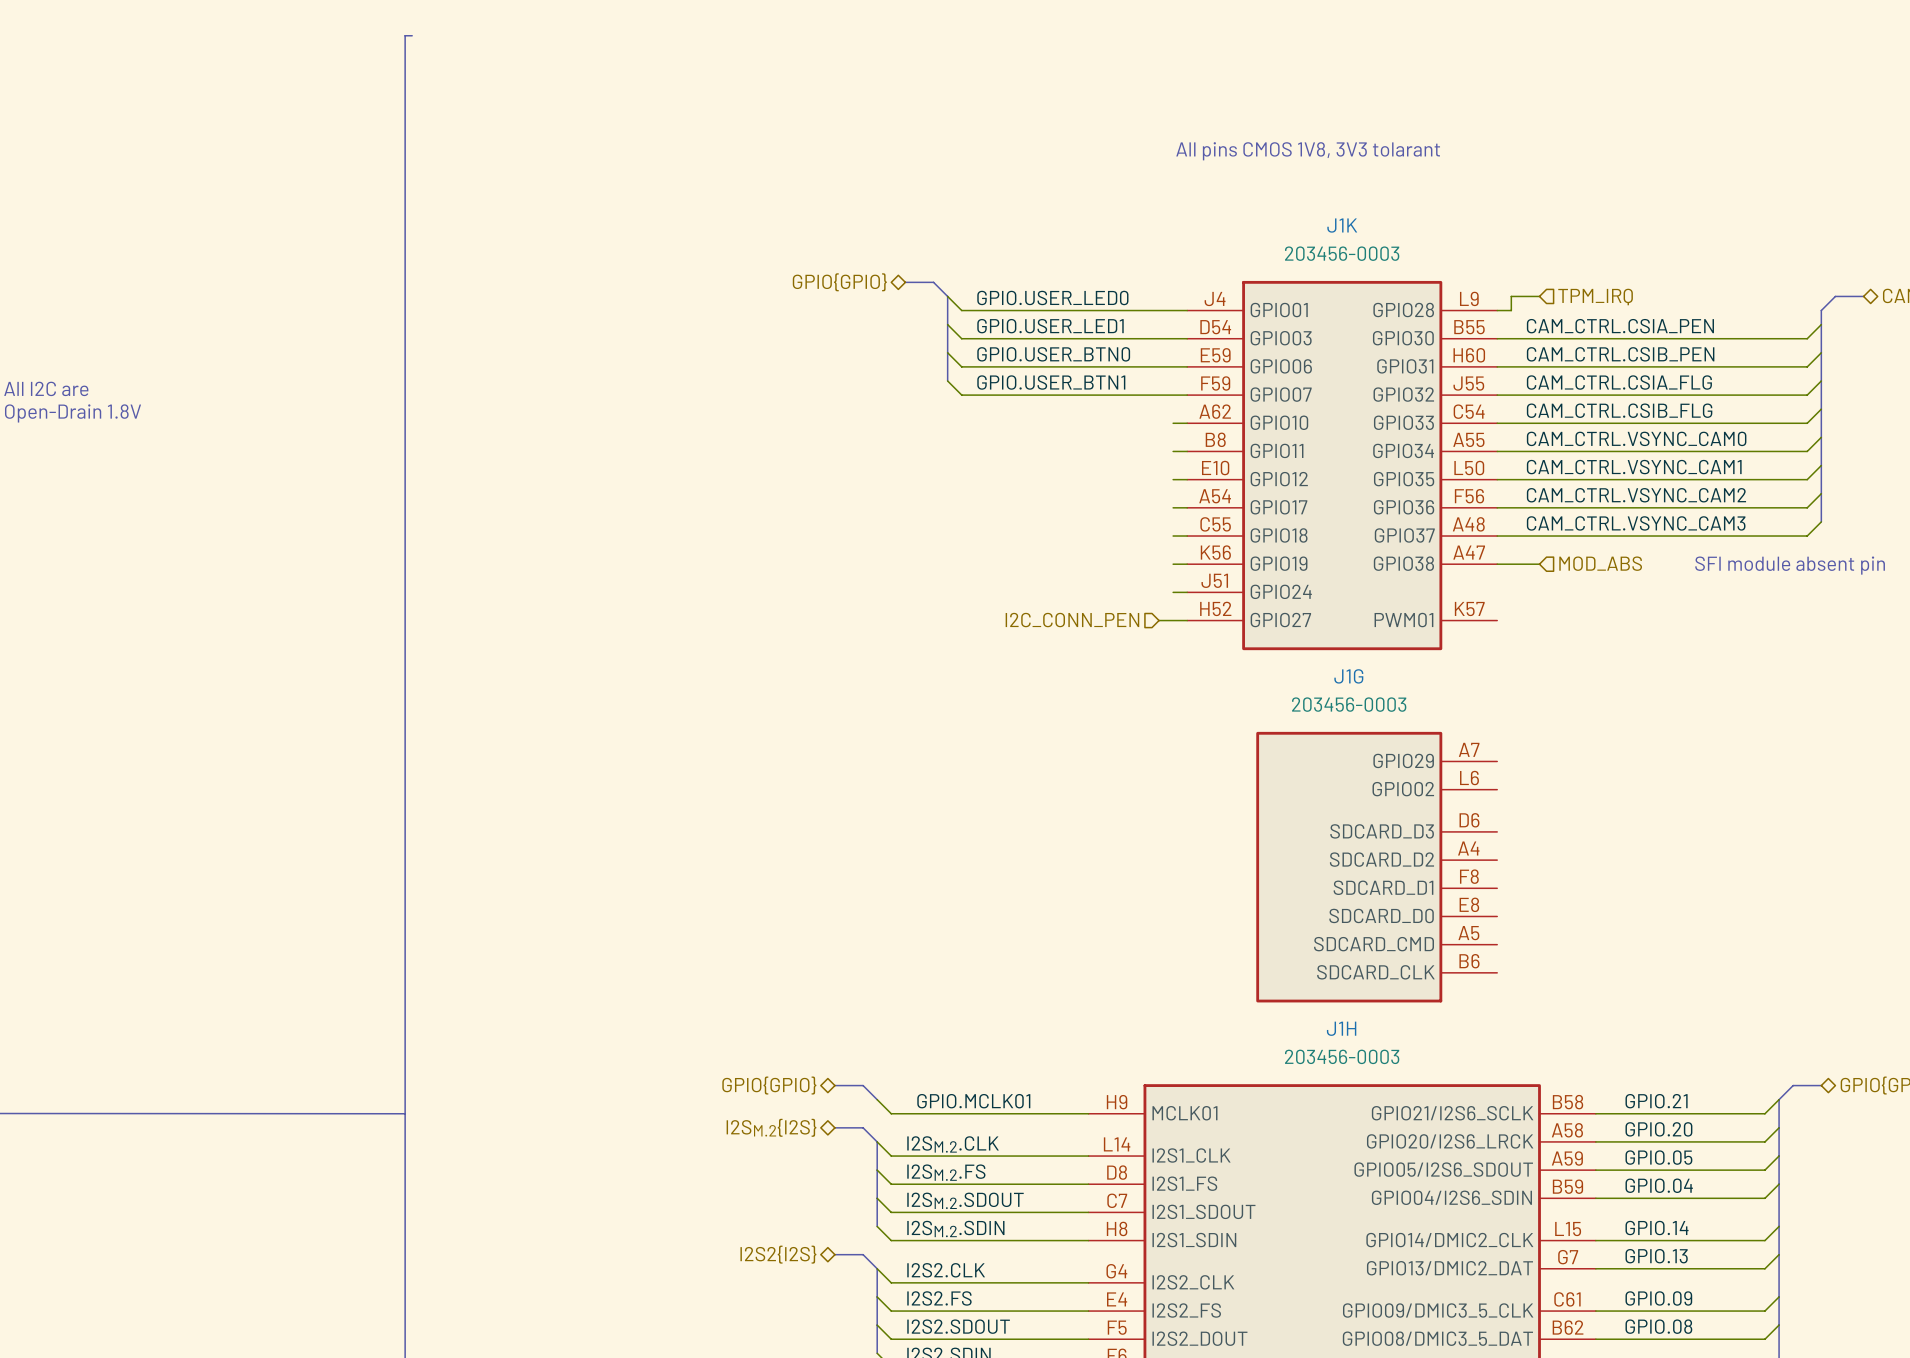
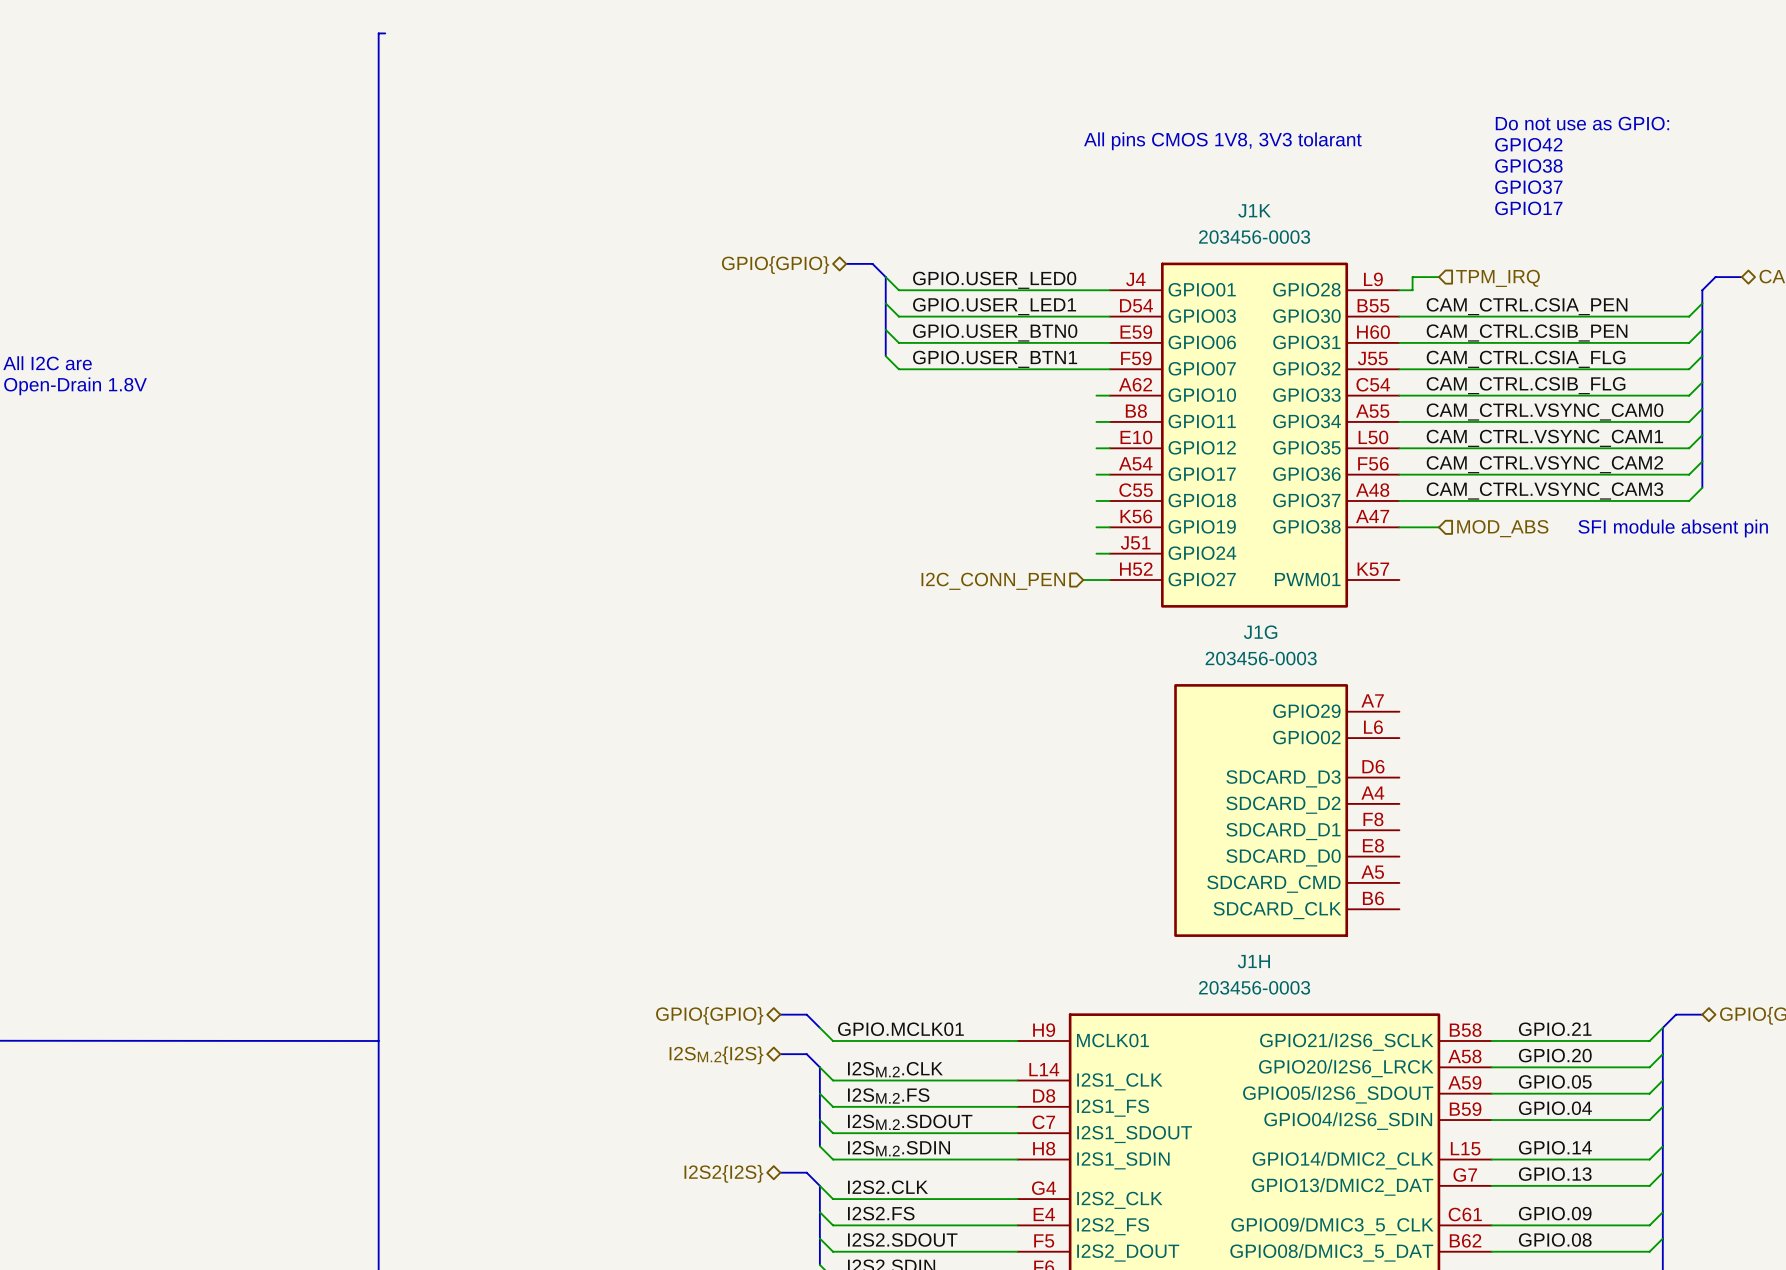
text: none -> Do not use as GPIO: (1582, 123)
text: none -> GPIO42 (1528, 144)
text: none -> GPIO38 (1528, 165)
text: none -> GPIO37 (1528, 187)
text: none -> GPIO17 (1528, 208)

